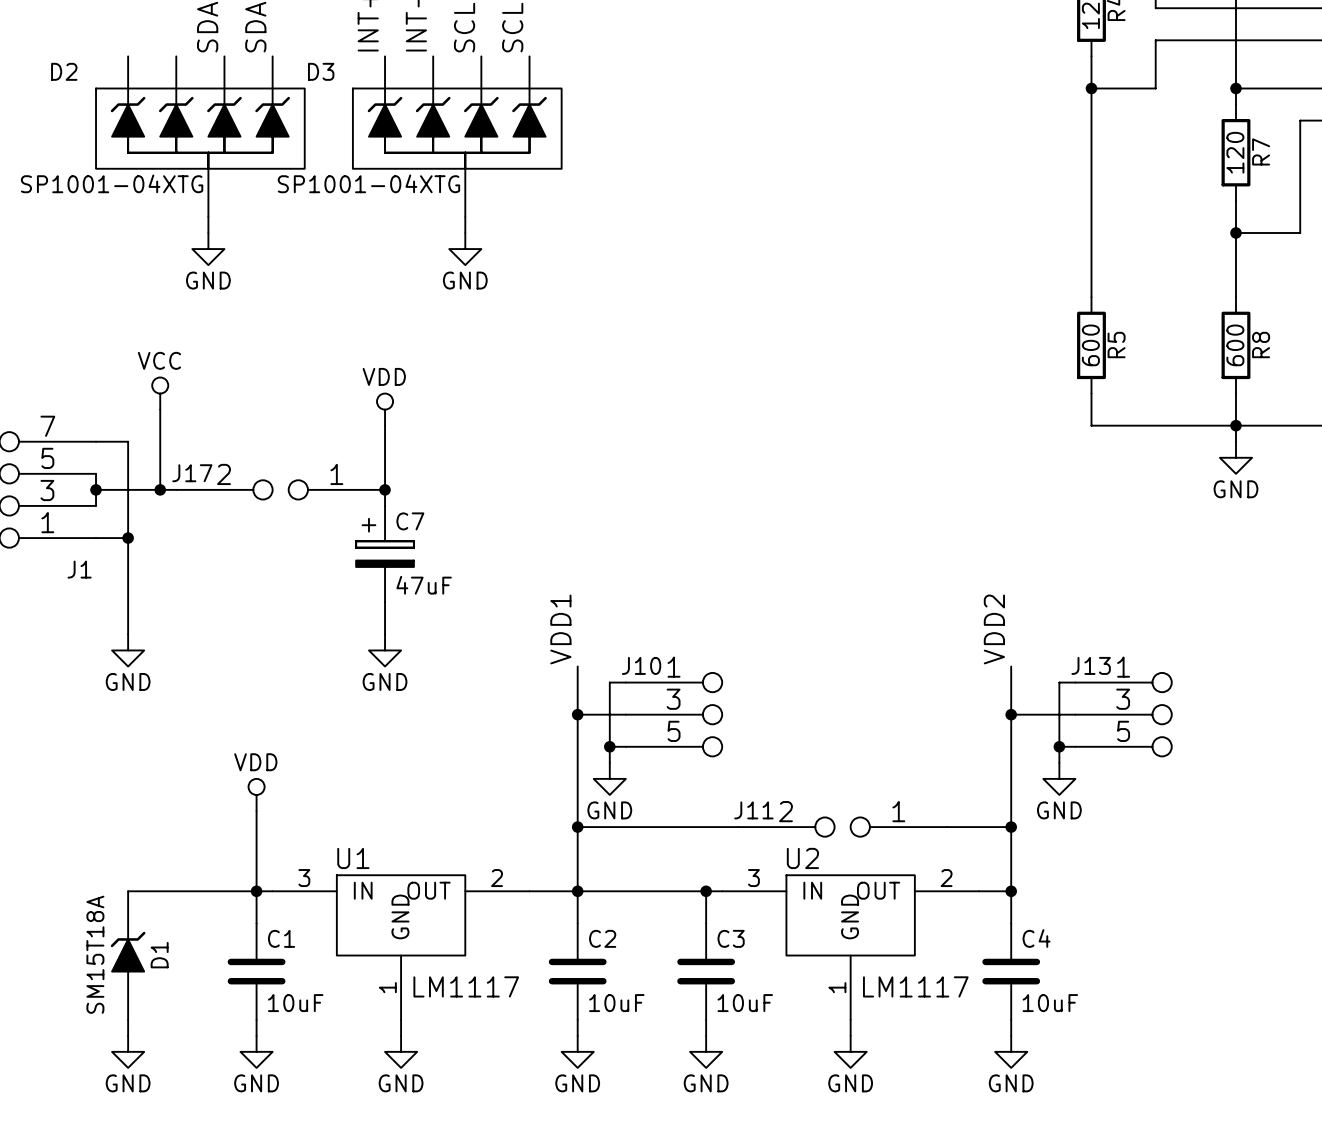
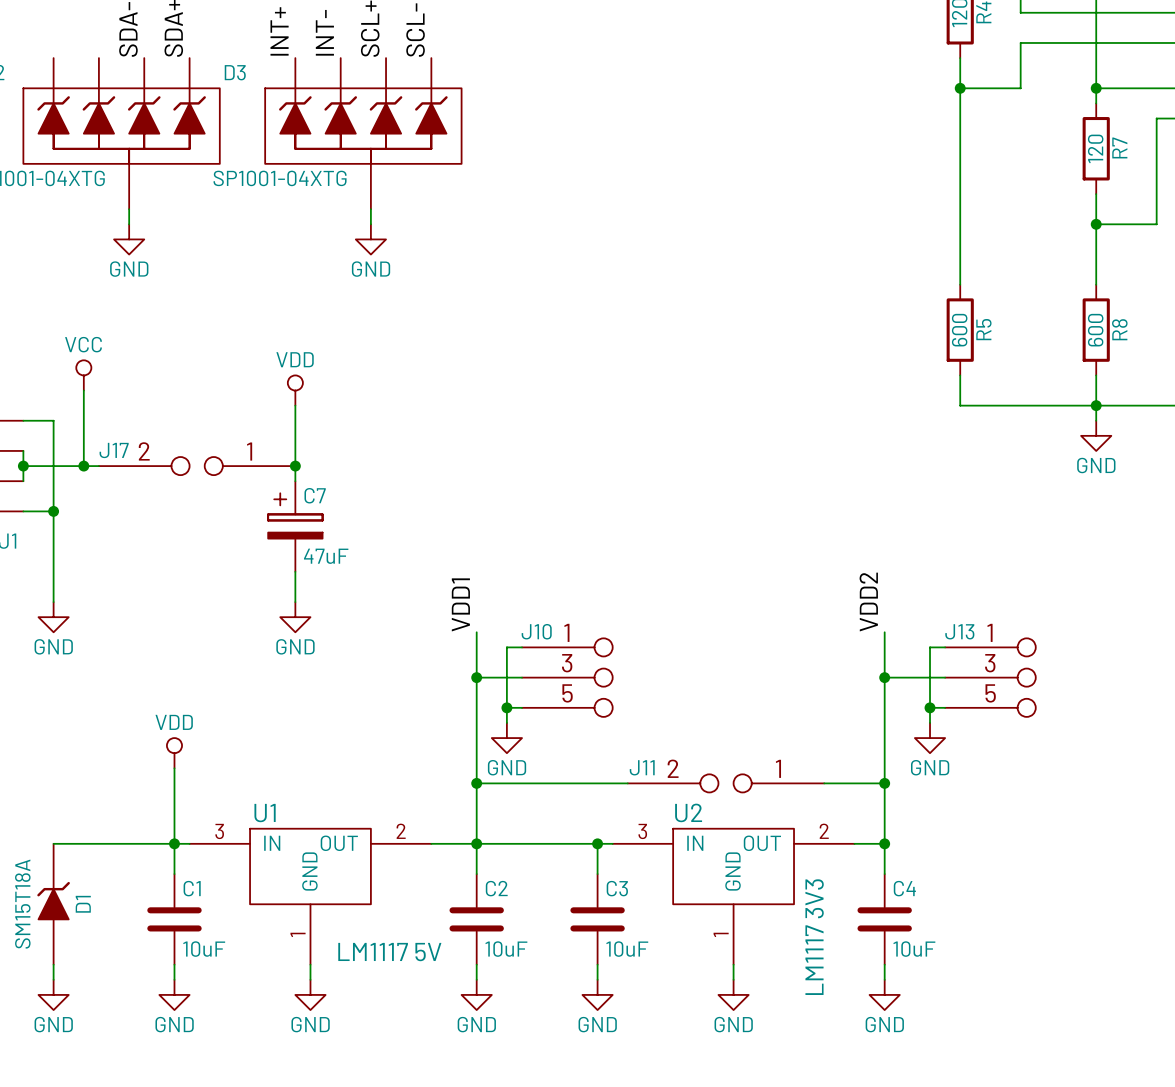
U1 value: LM1117 (466, 986) -> LM1117 5V (389, 952)
U2 value: LM1117 (915, 986) -> LM1117 3V3 (814, 937)

